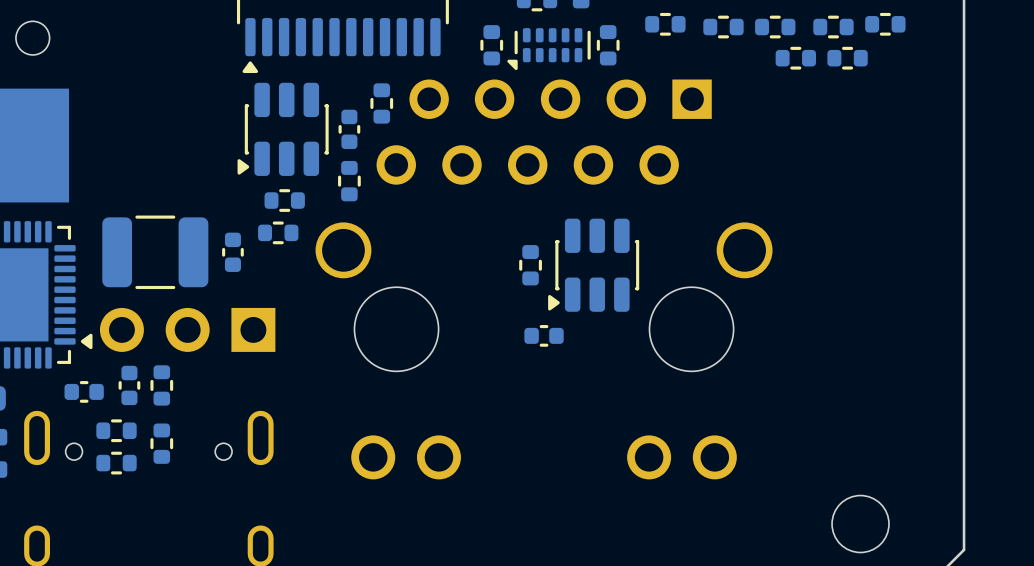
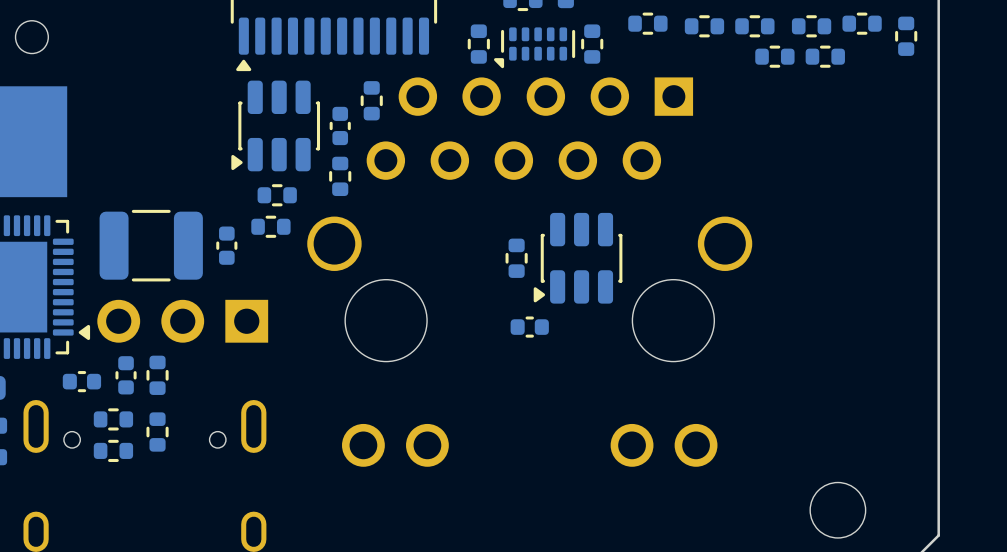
part: none -> (906, 36)

